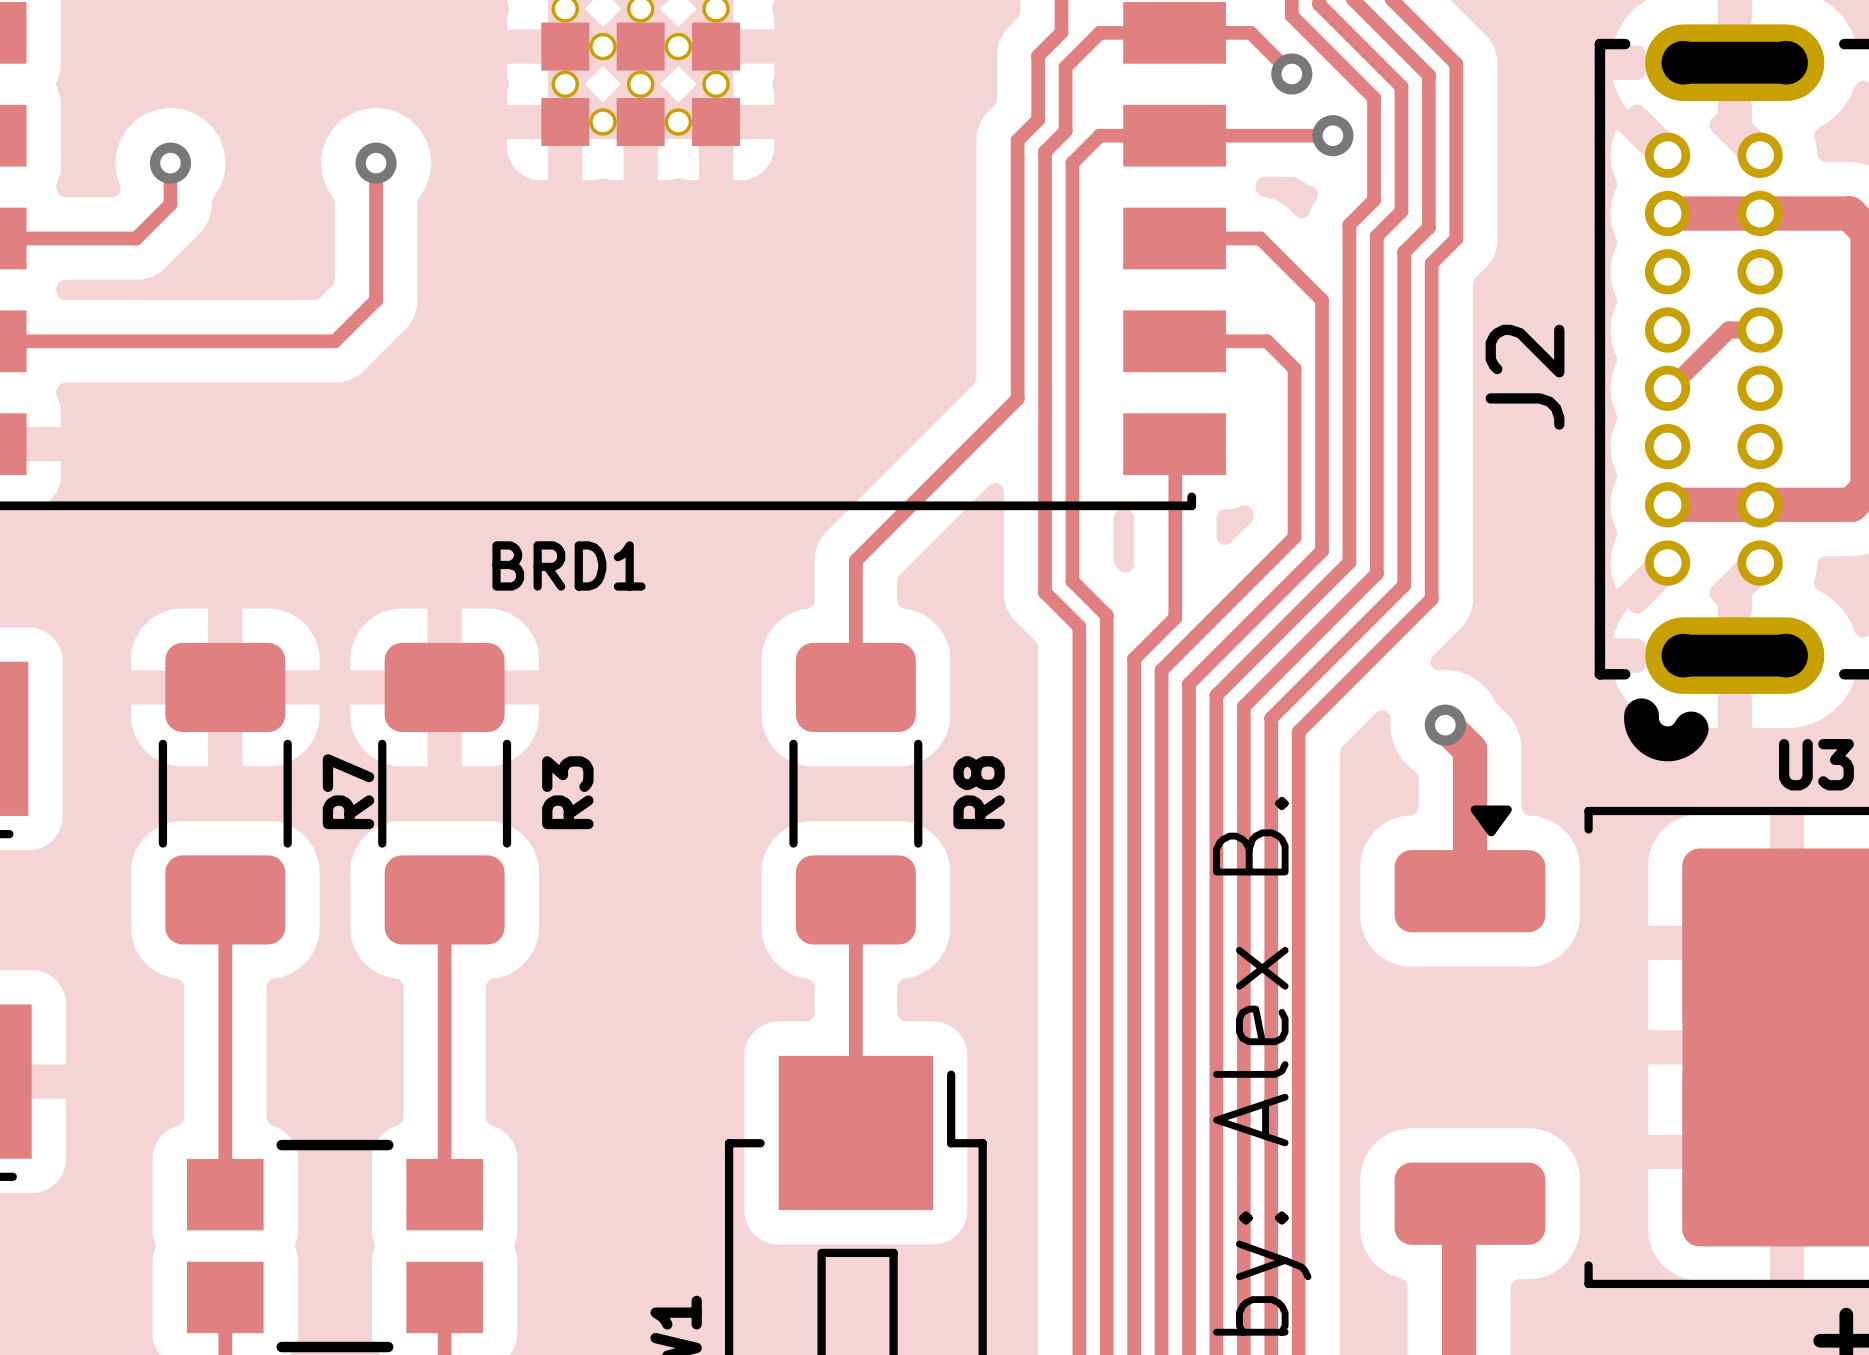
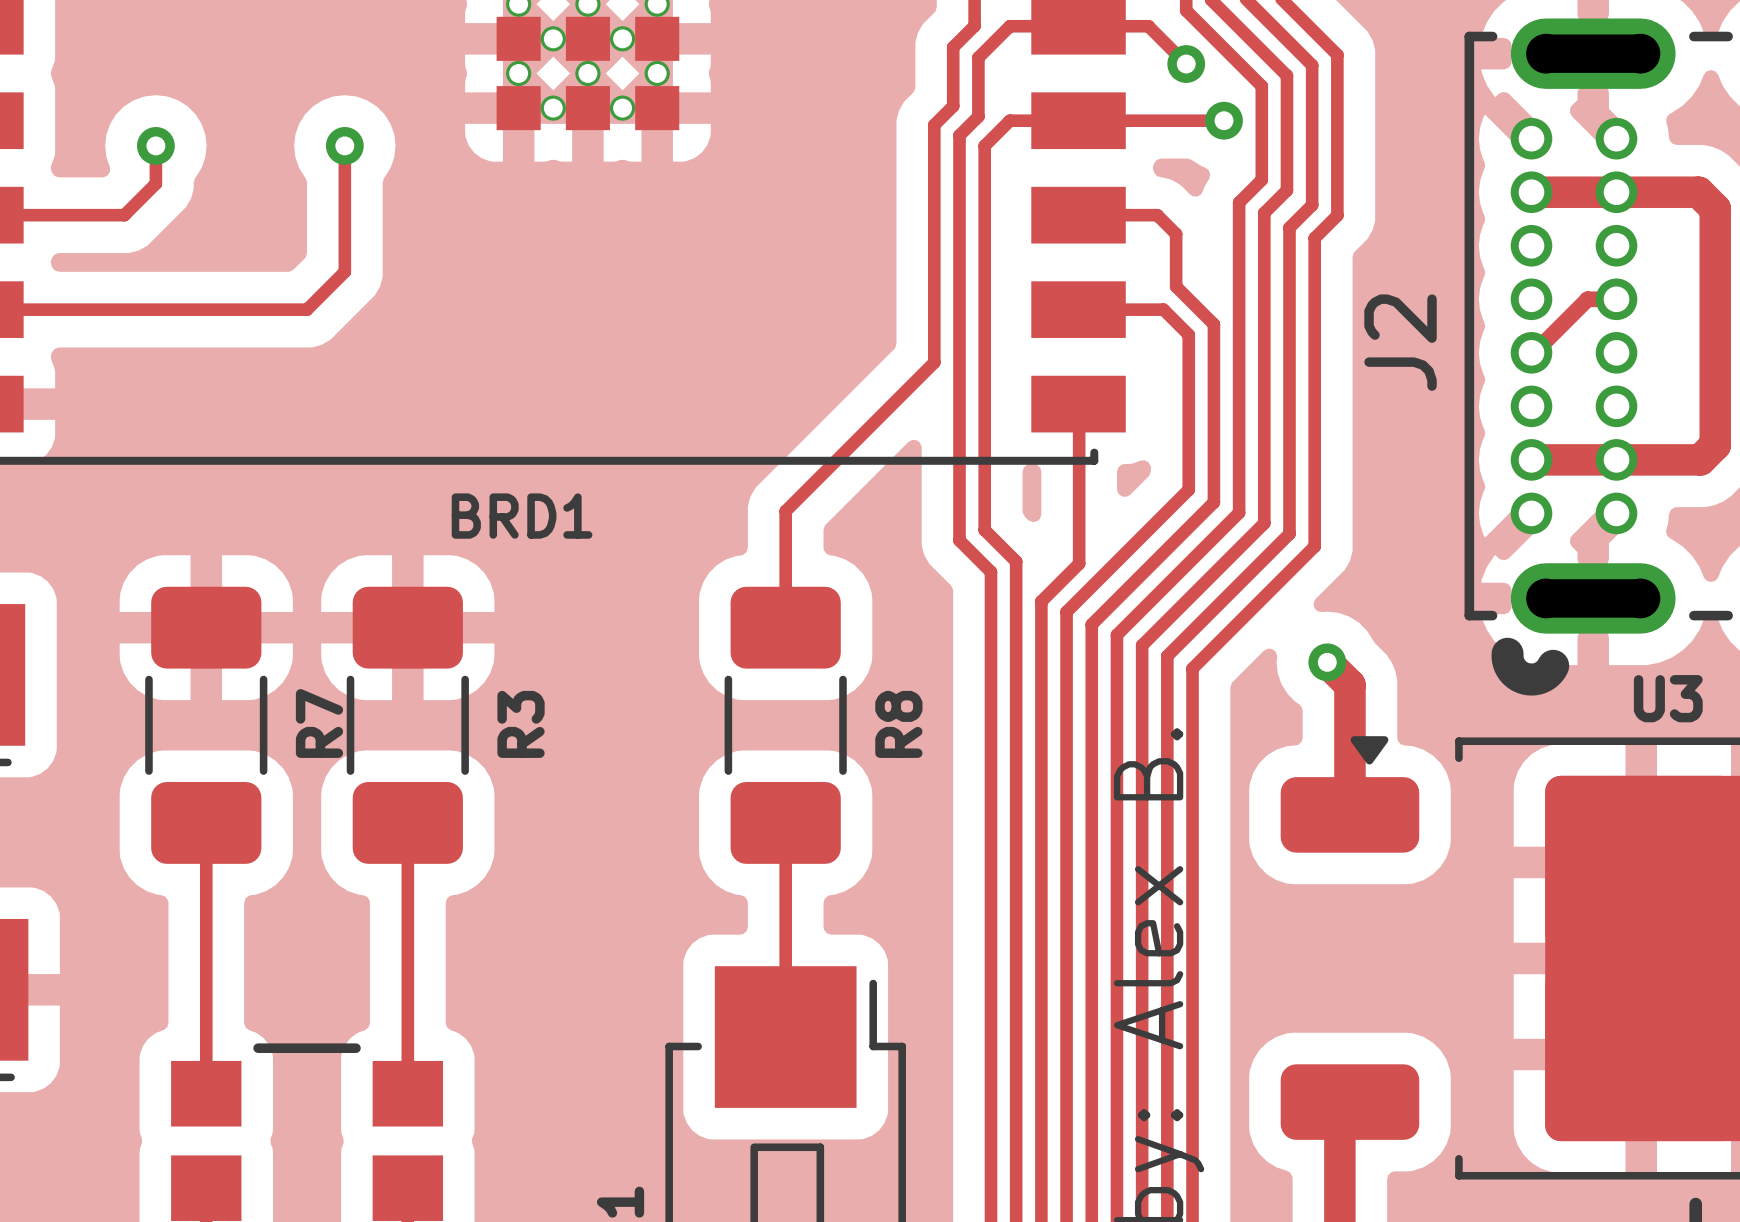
track: (1280, 259) (1321, 300) (1321, 357) -> (1176, 234) (1176, 286) (1213, 324)

